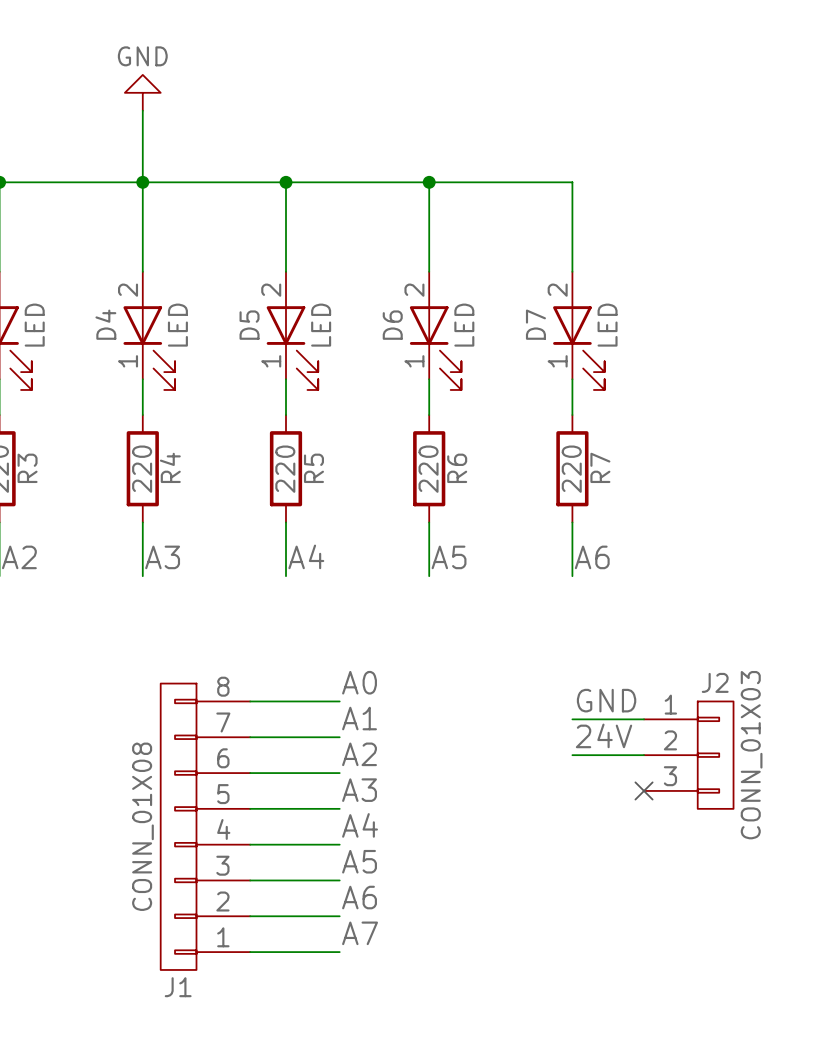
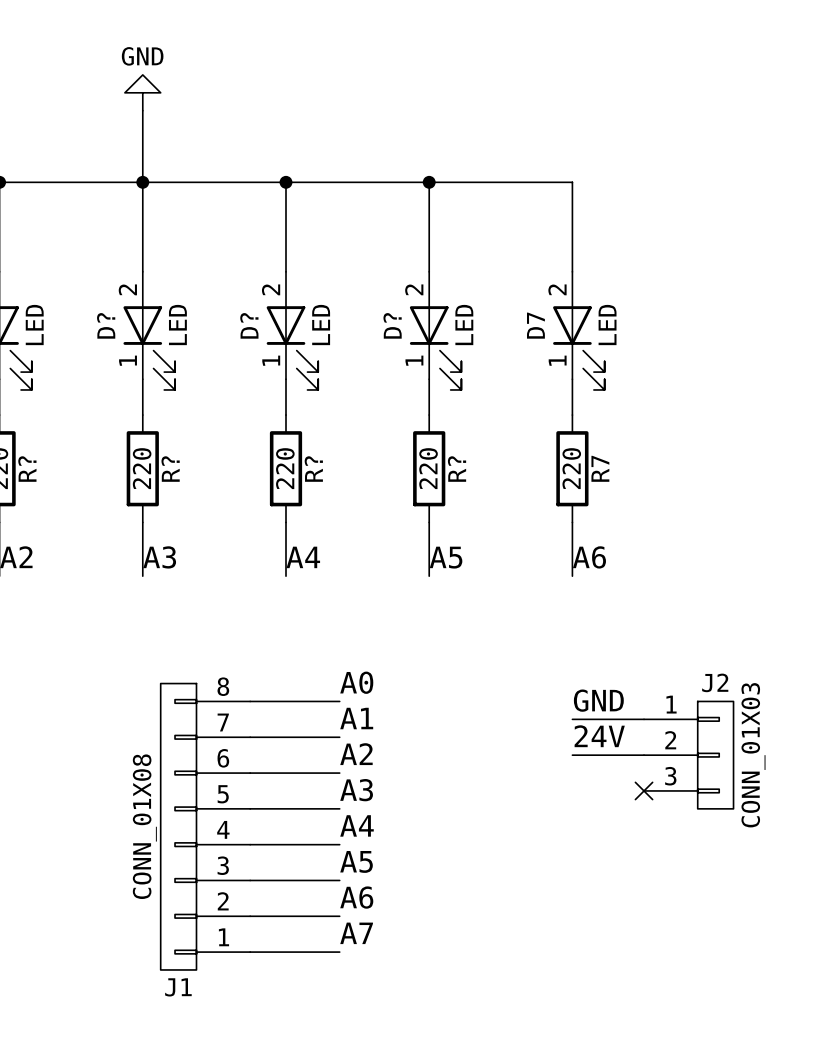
D4 name: D4 (105, 324) -> D? (106, 325)
D5 name: D5 (249, 325) -> D? (249, 325)
D6 name: D6 (392, 325) -> D? (392, 325)
R4 name: R4 (170, 467) -> R? (170, 469)
R3 name: R3 (27, 468) -> R? (27, 469)
R5 name: R5 (313, 468) -> R? (313, 469)
R6 name: R6 (457, 468) -> R? (457, 469)

